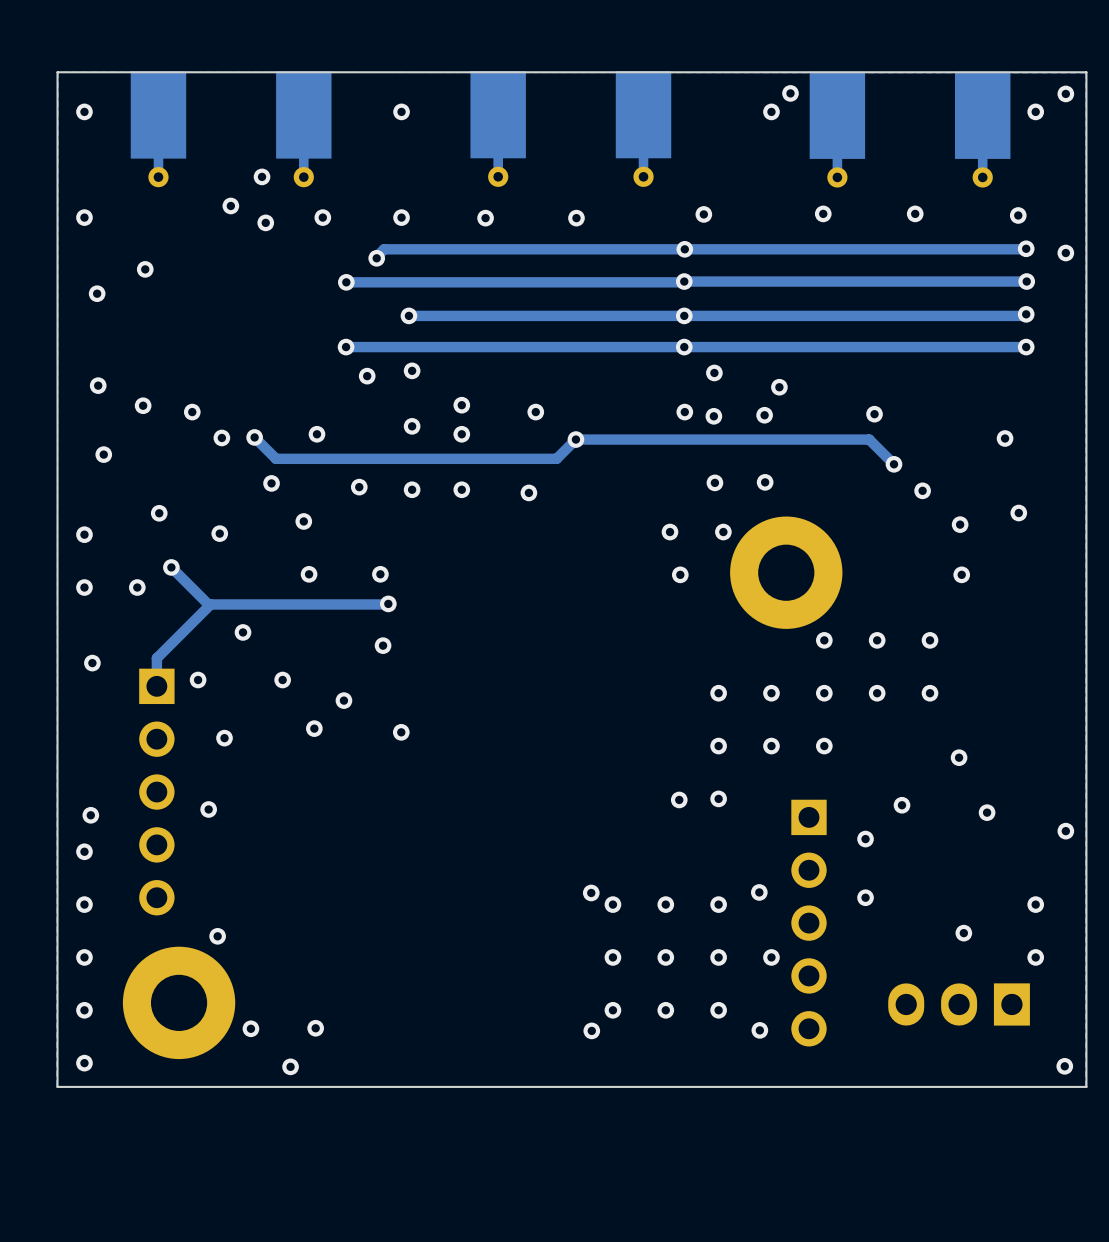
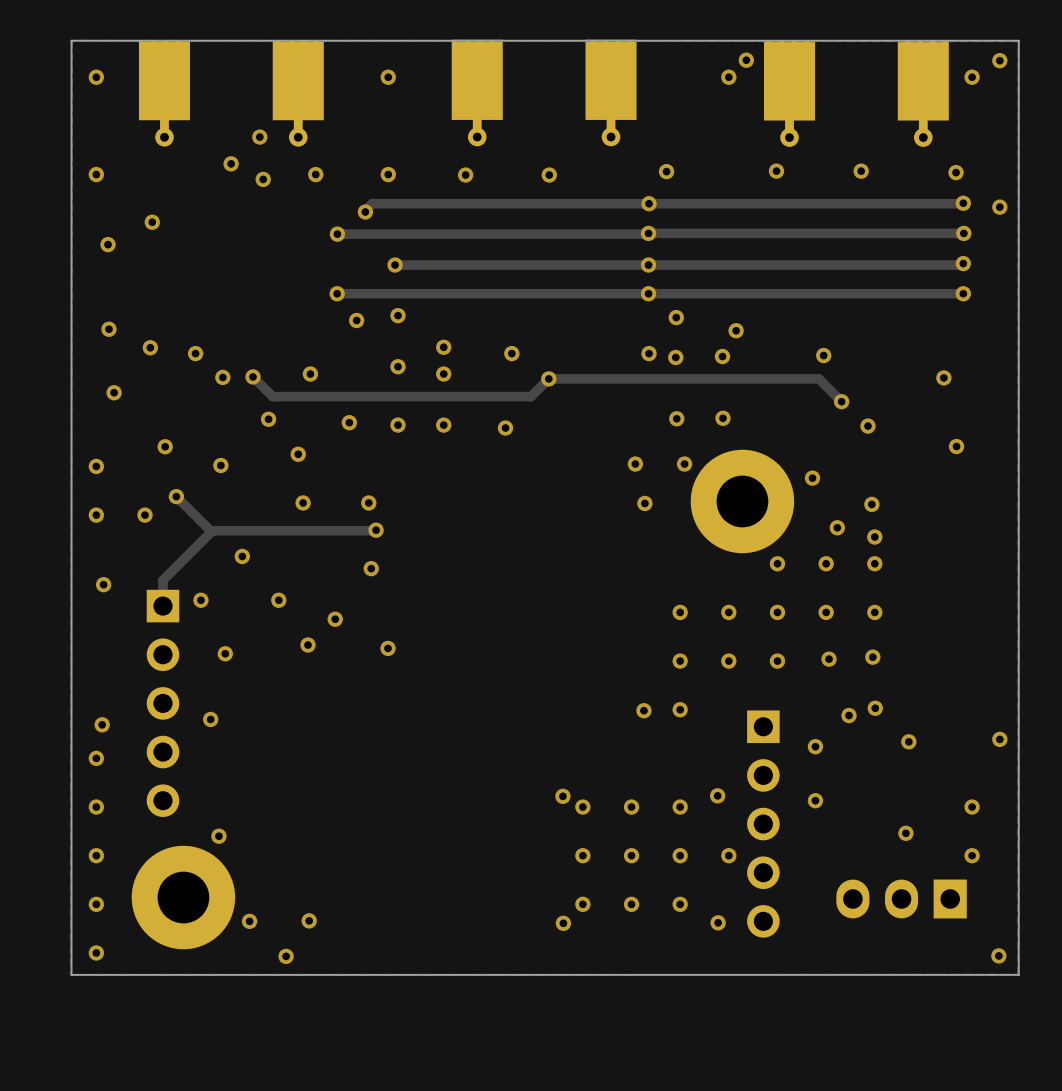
via: (960, 524) -> none
via: none -> (812, 478)
via: (961, 574) -> none
via: none -> (871, 504)
via: none -> (837, 527)
via: none -> (874, 537)
via: none -> (872, 657)
via: none -> (829, 659)
via: (959, 757) -> none
via: none -> (875, 708)
via: (987, 812) -> none
via: none -> (908, 741)

